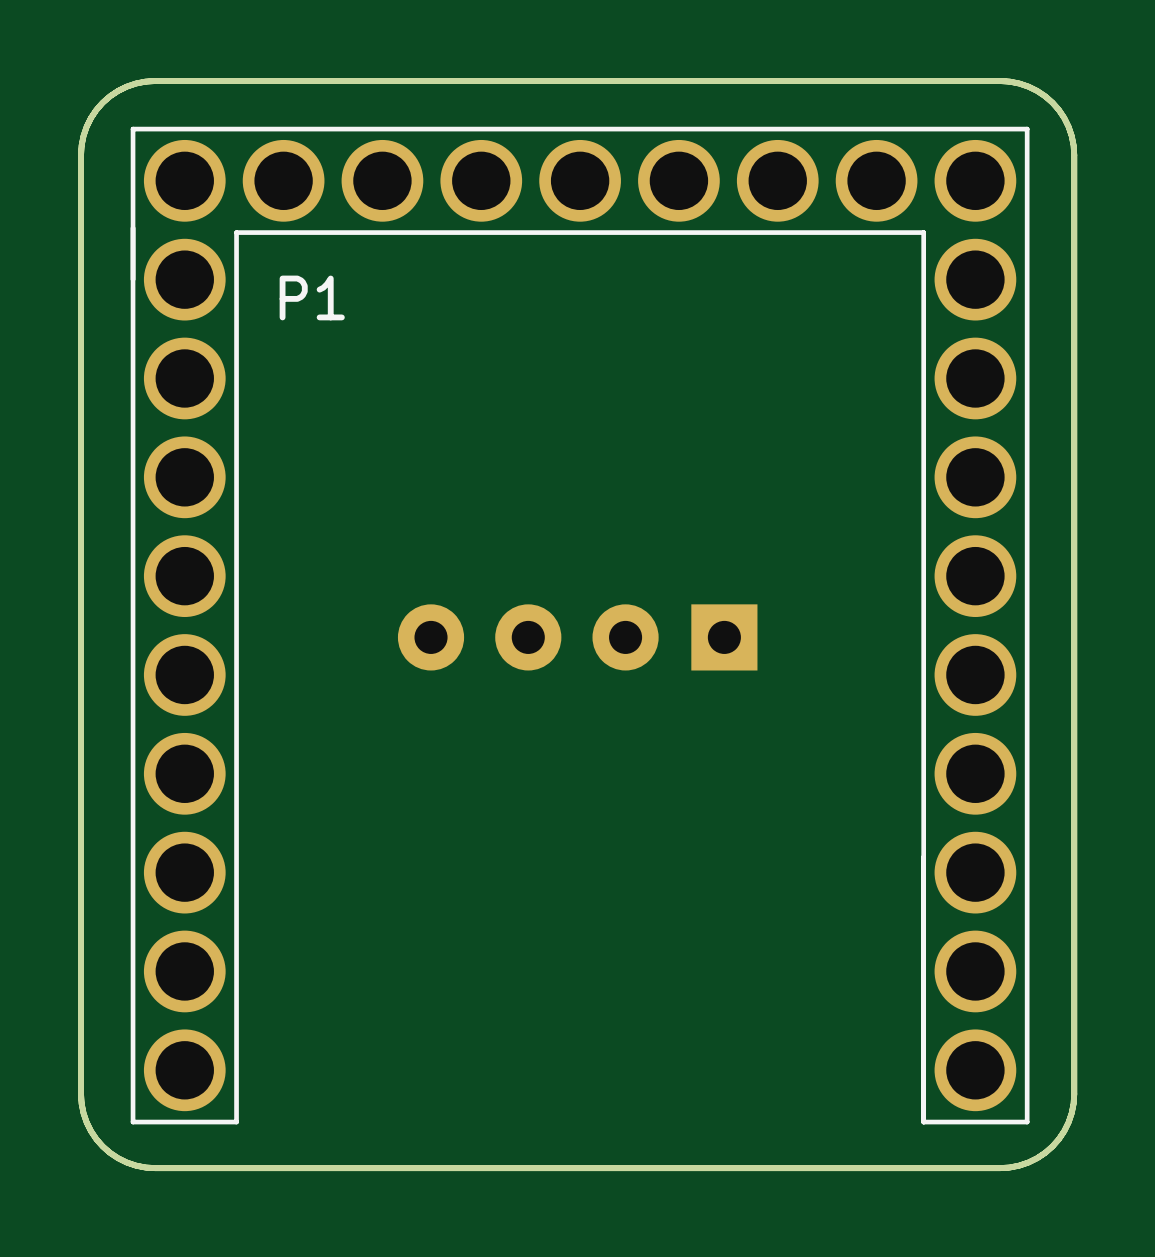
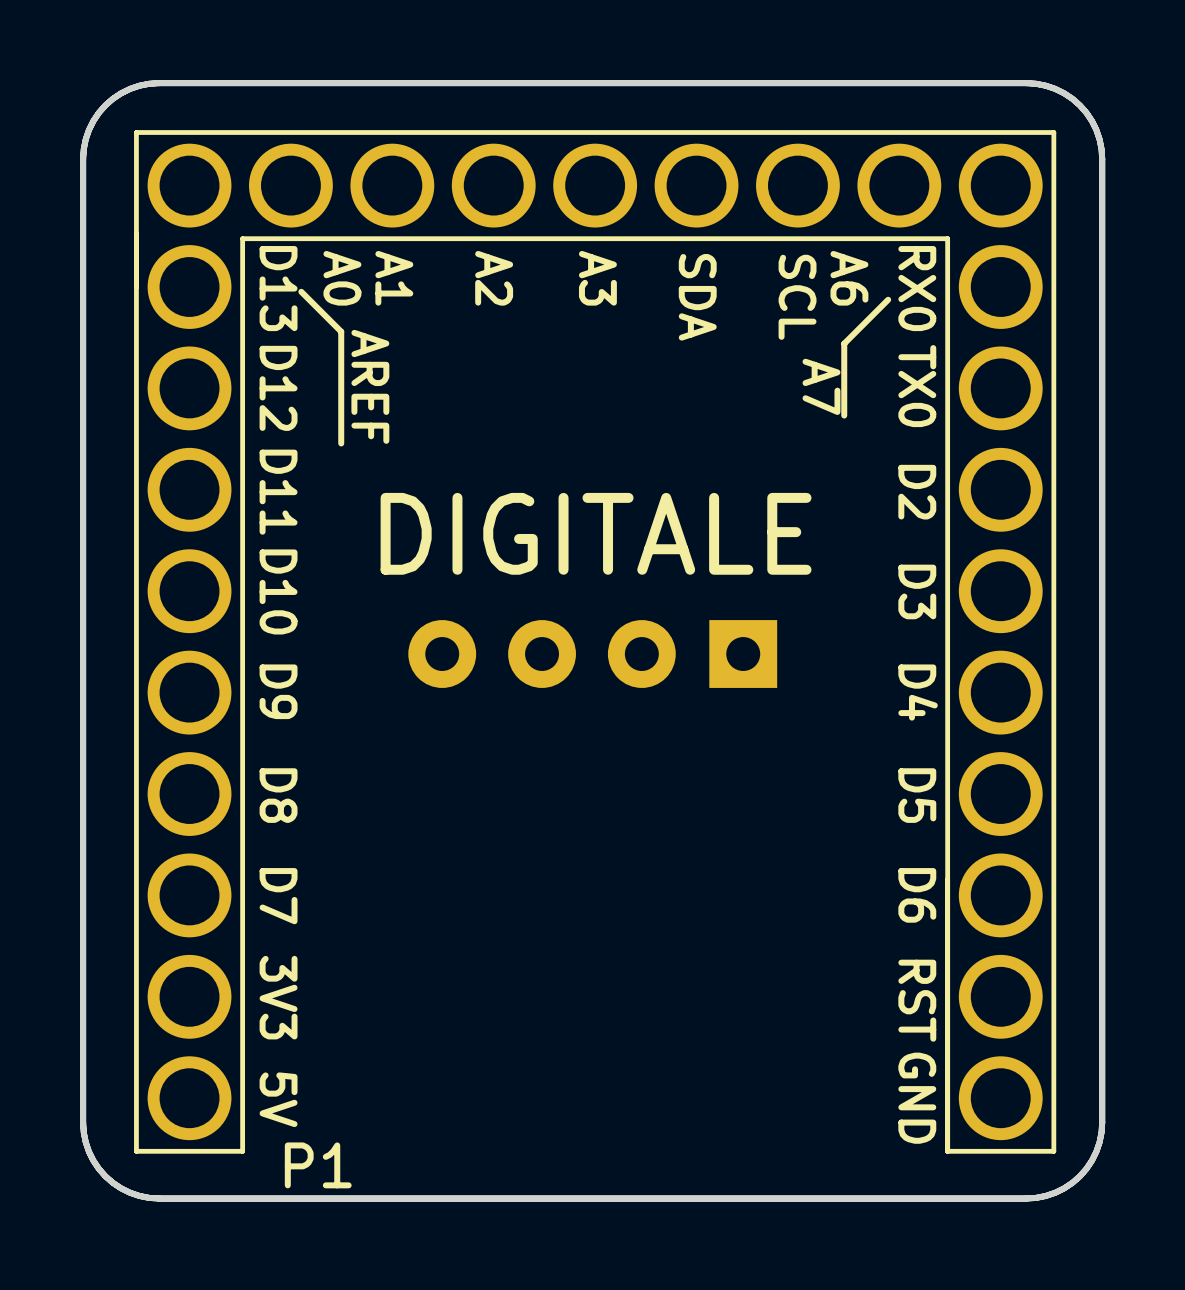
P1 footprint: [130, 126, 1030, 1125] -> [134, 130, 1057, 1154]
P1 name position: P1 (312, 297) -> P1 (318, 1165)
text: none -> DIGITALE (596, 533)

